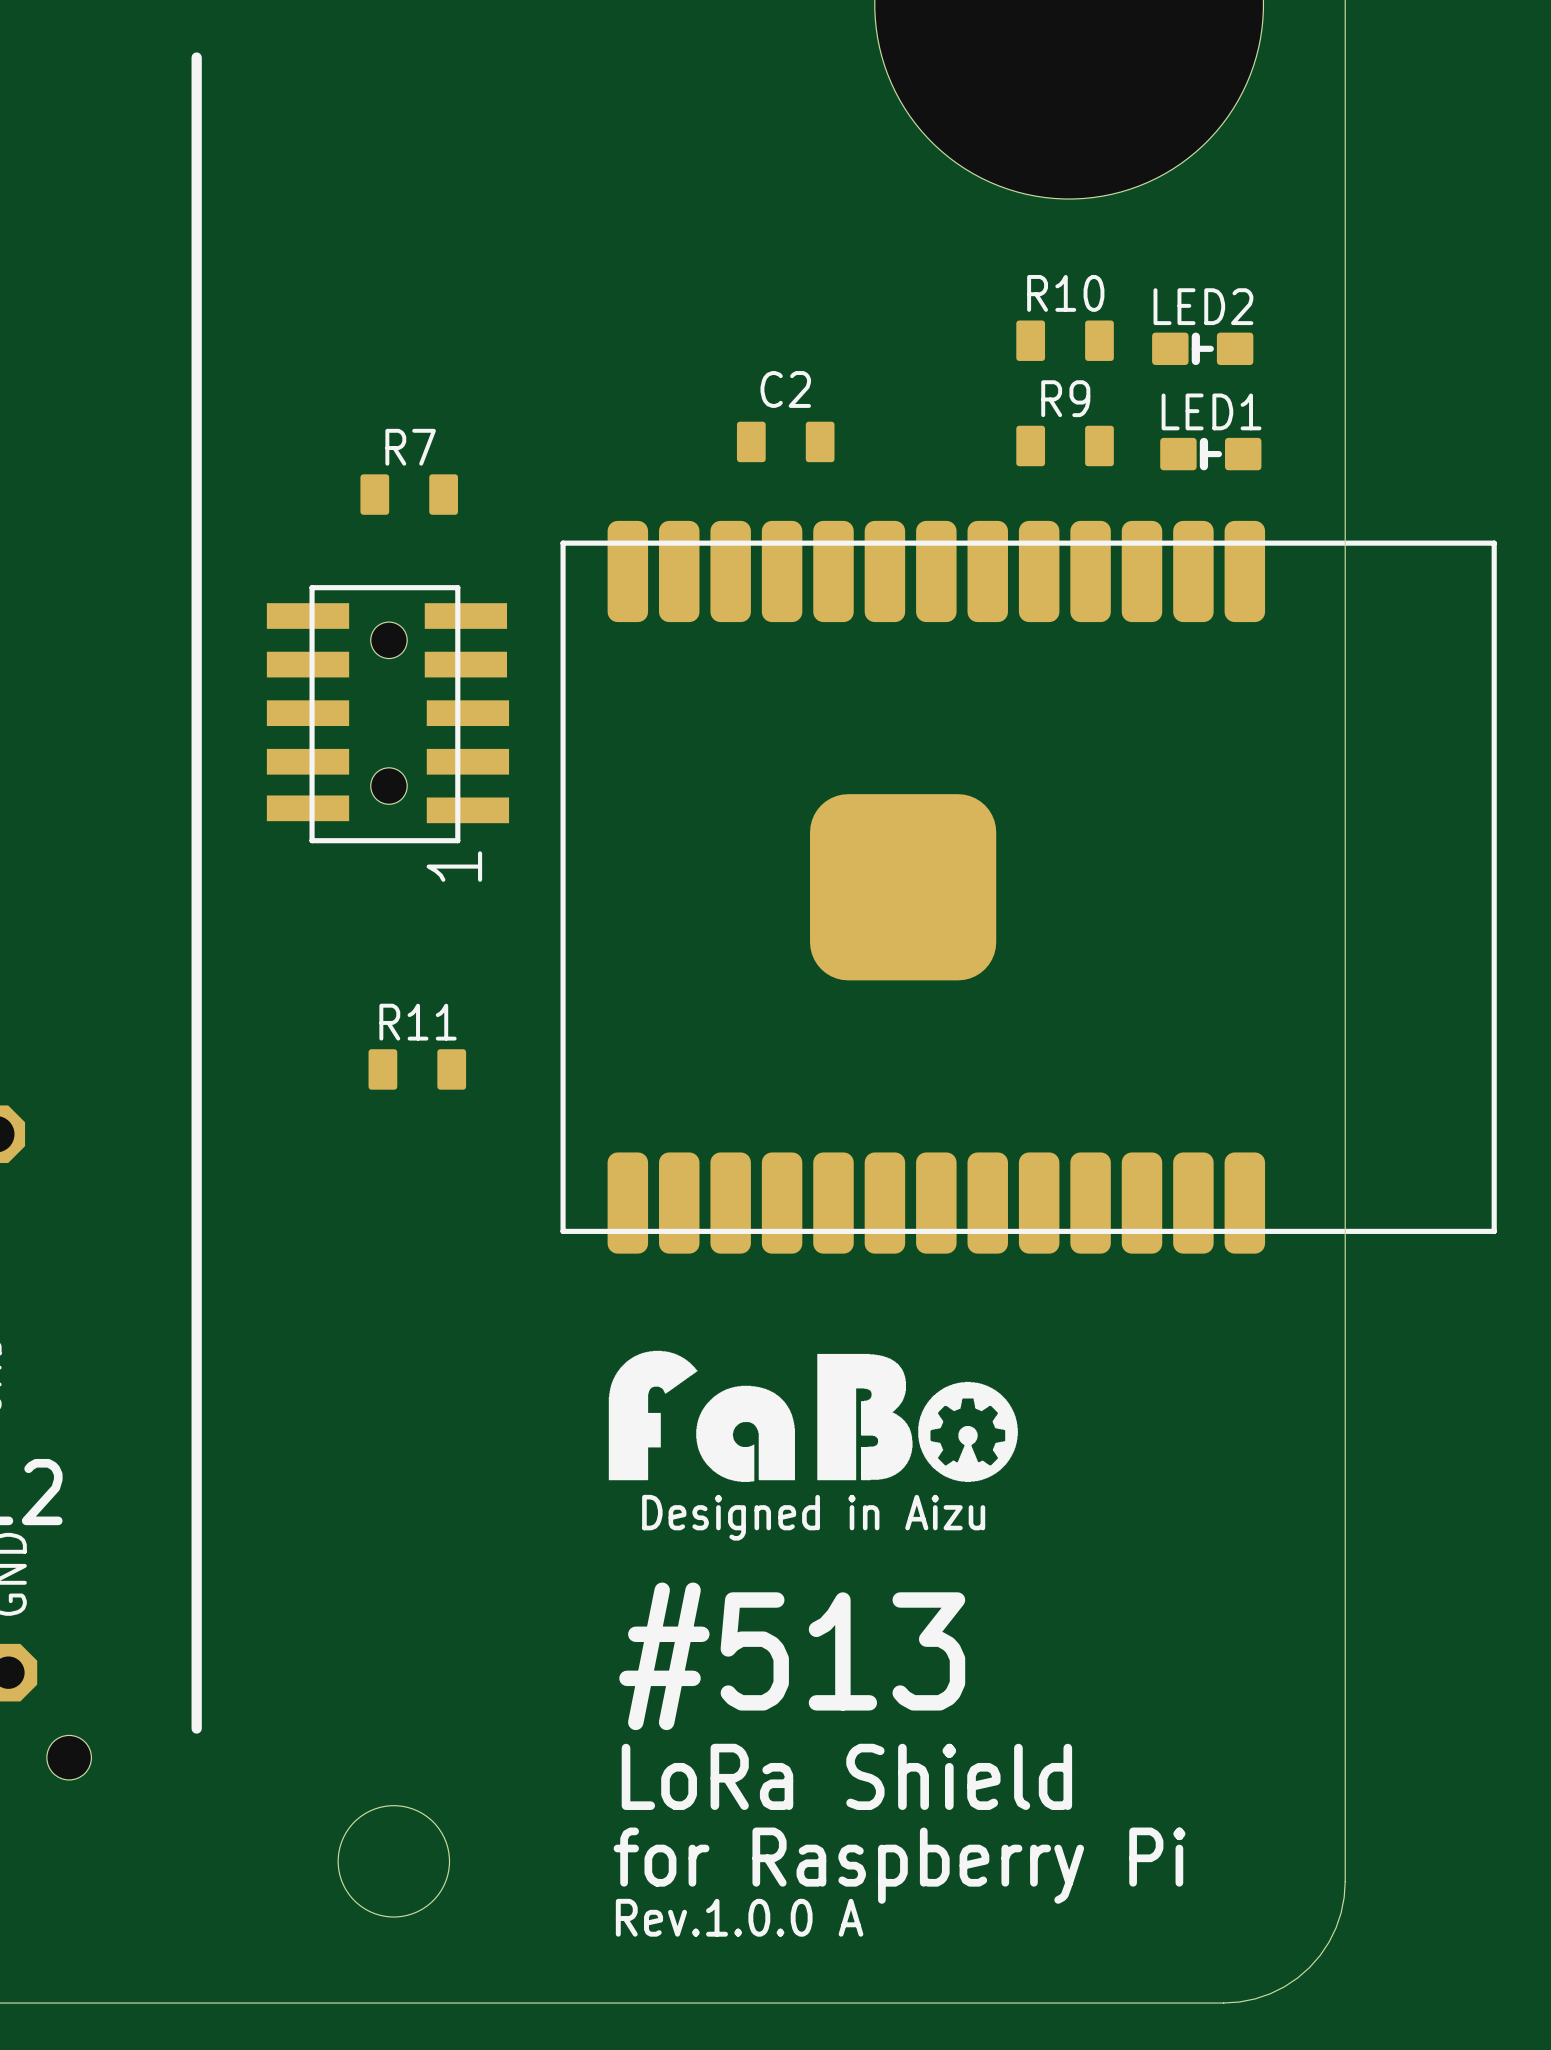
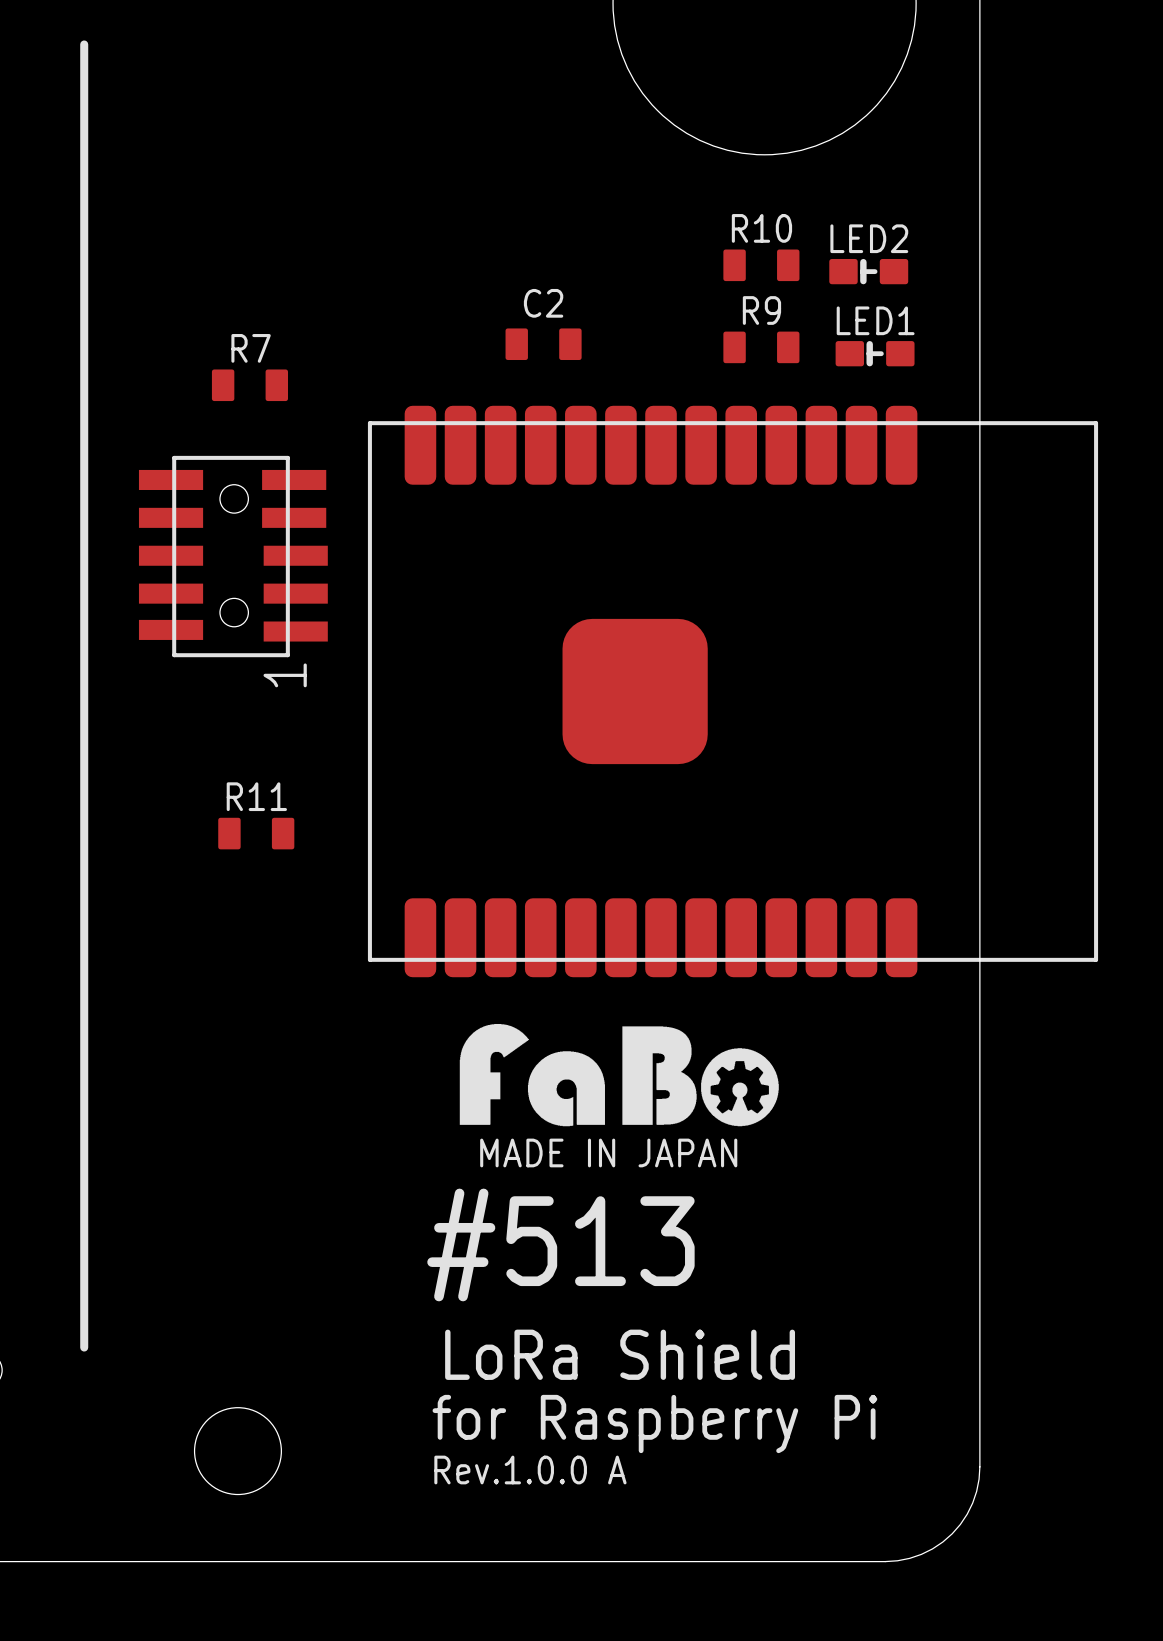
drawing position: (813, 1416) -> (619, 1075)
text: none -> MADE IN JAPAN (608, 1152)
text: Designed in Aizu (813, 1517) -> none
text position: #513 (792, 1656) -> #513 (560, 1244)
text position: LoRa Shield (846, 1776) -> LoRa Shield (620, 1354)
text position: for Raspberry Pi (899, 1865) -> for Raspberry Pi (654, 1424)
text position: Rev.1.0.0 A (739, 1917) -> Rev.1.0.0 A (530, 1470)

